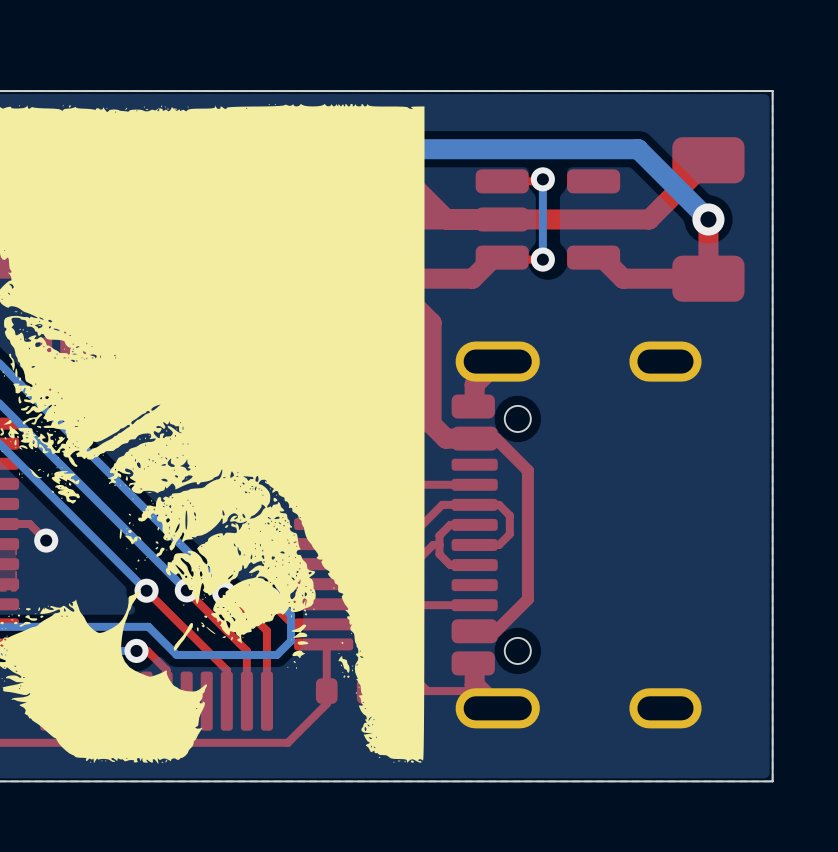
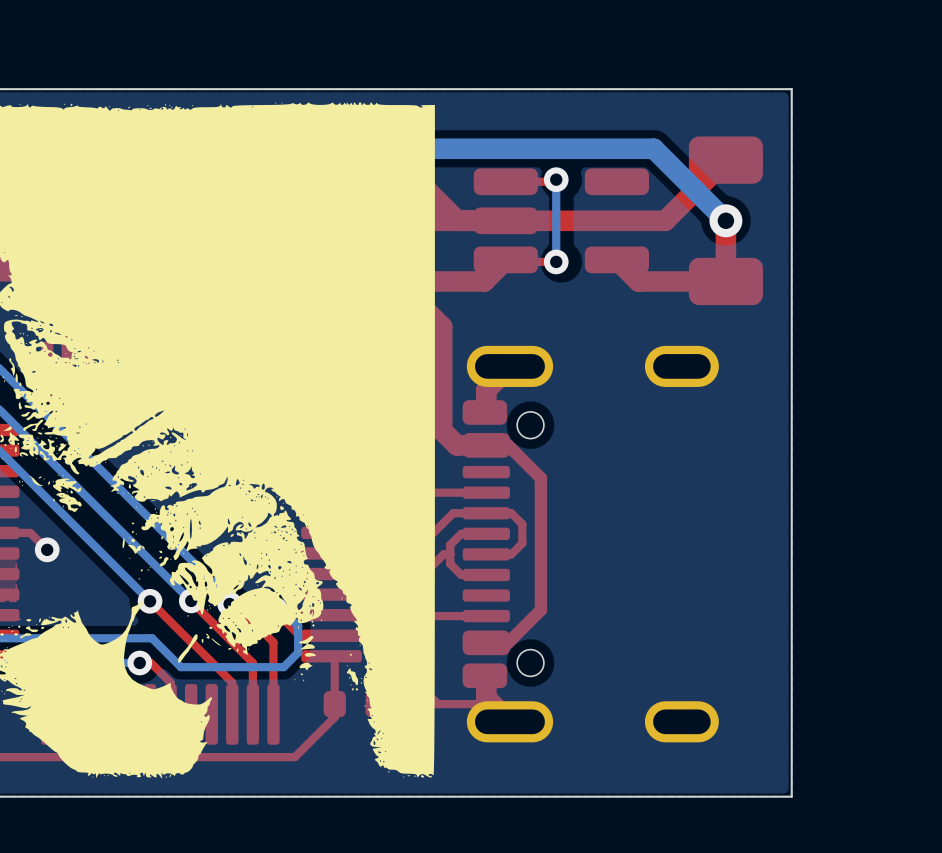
part footprint: [475, 169, 621, 270] -> [473, 168, 650, 274]

